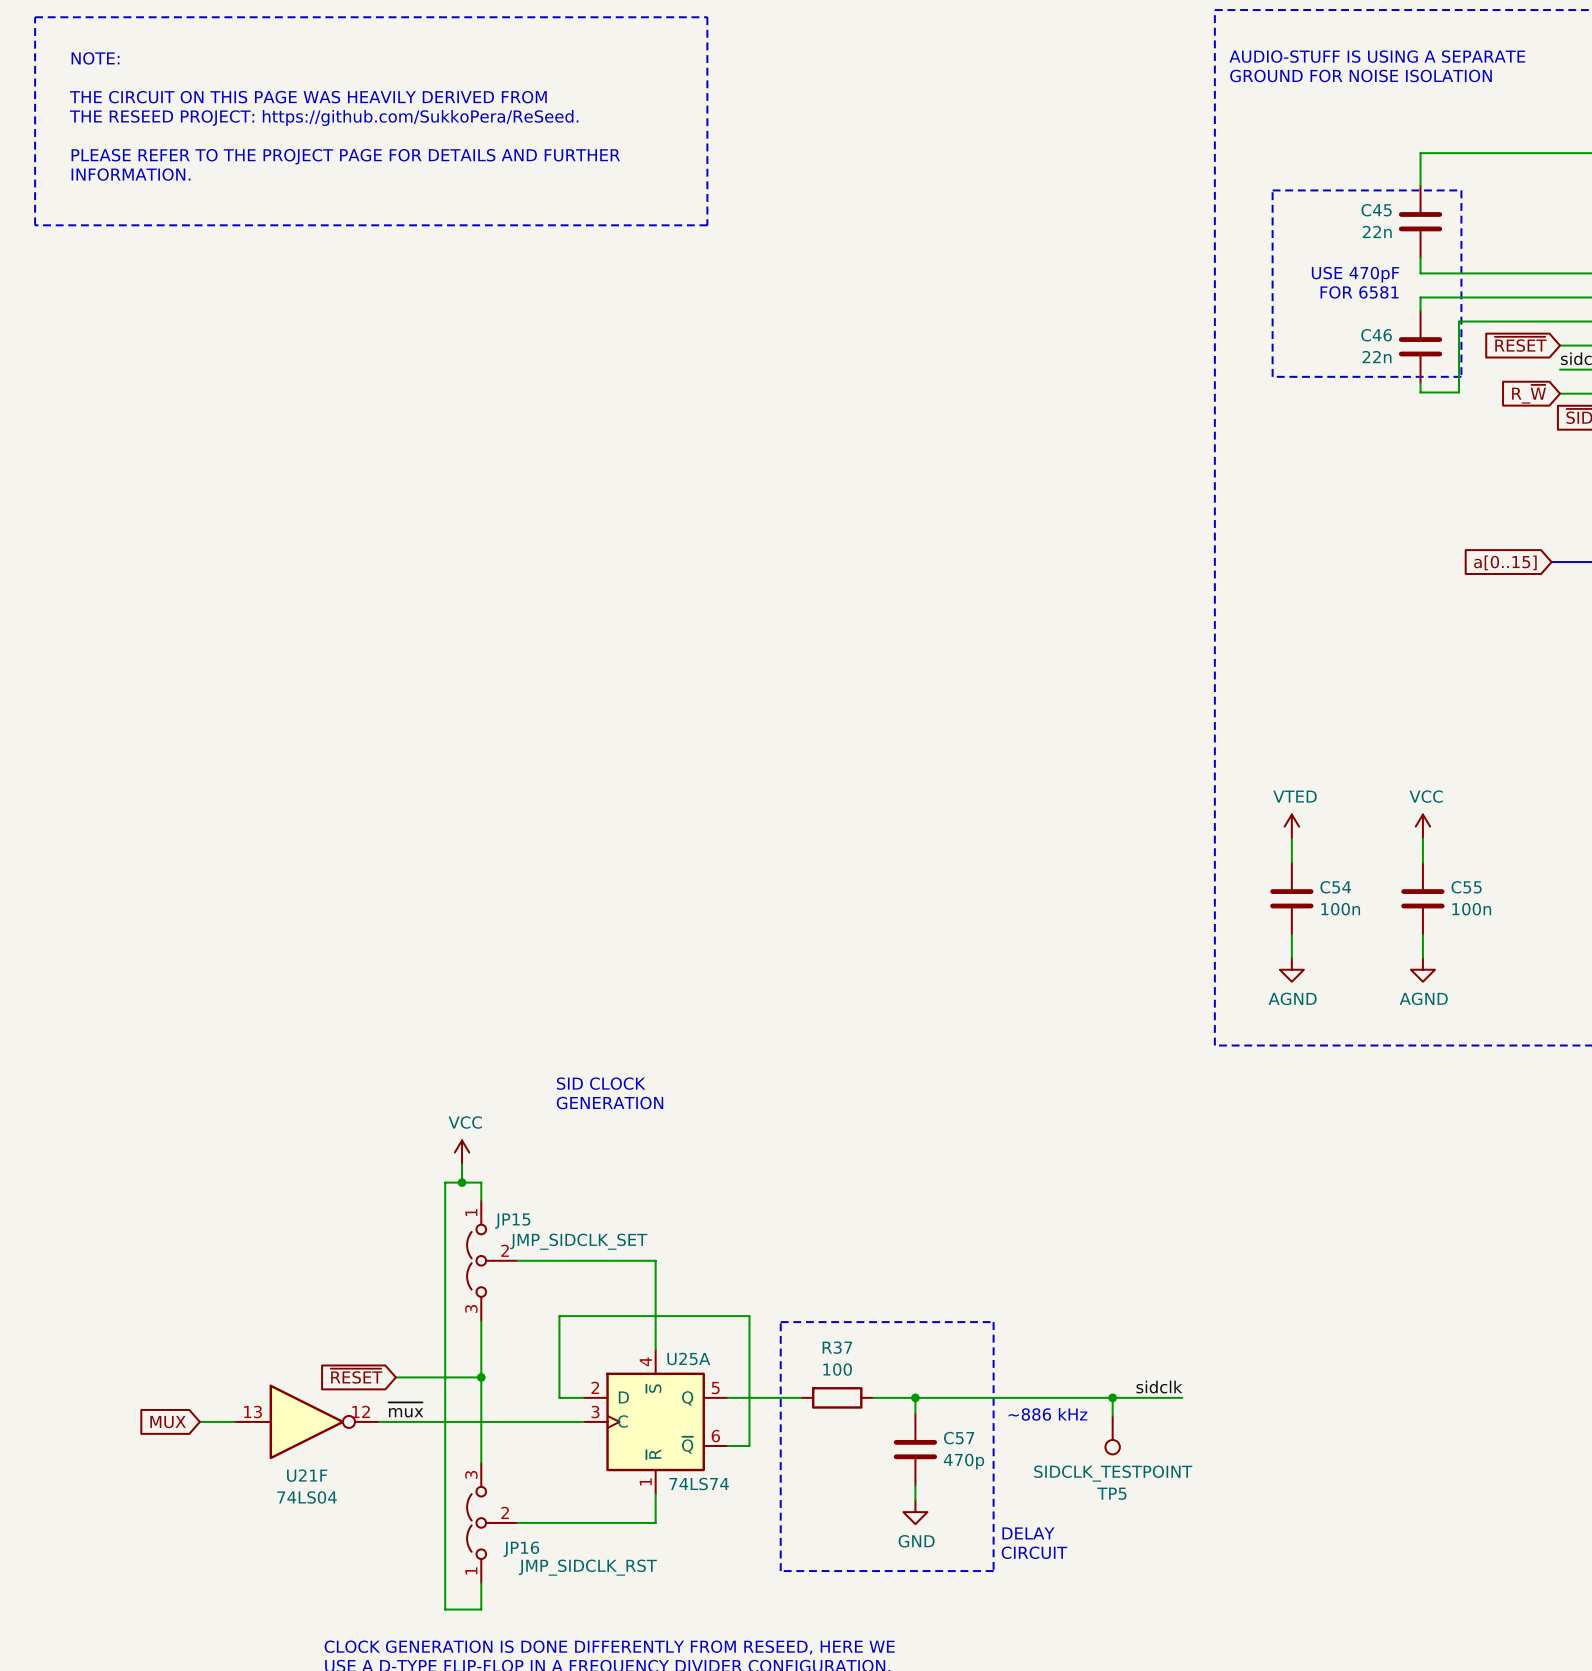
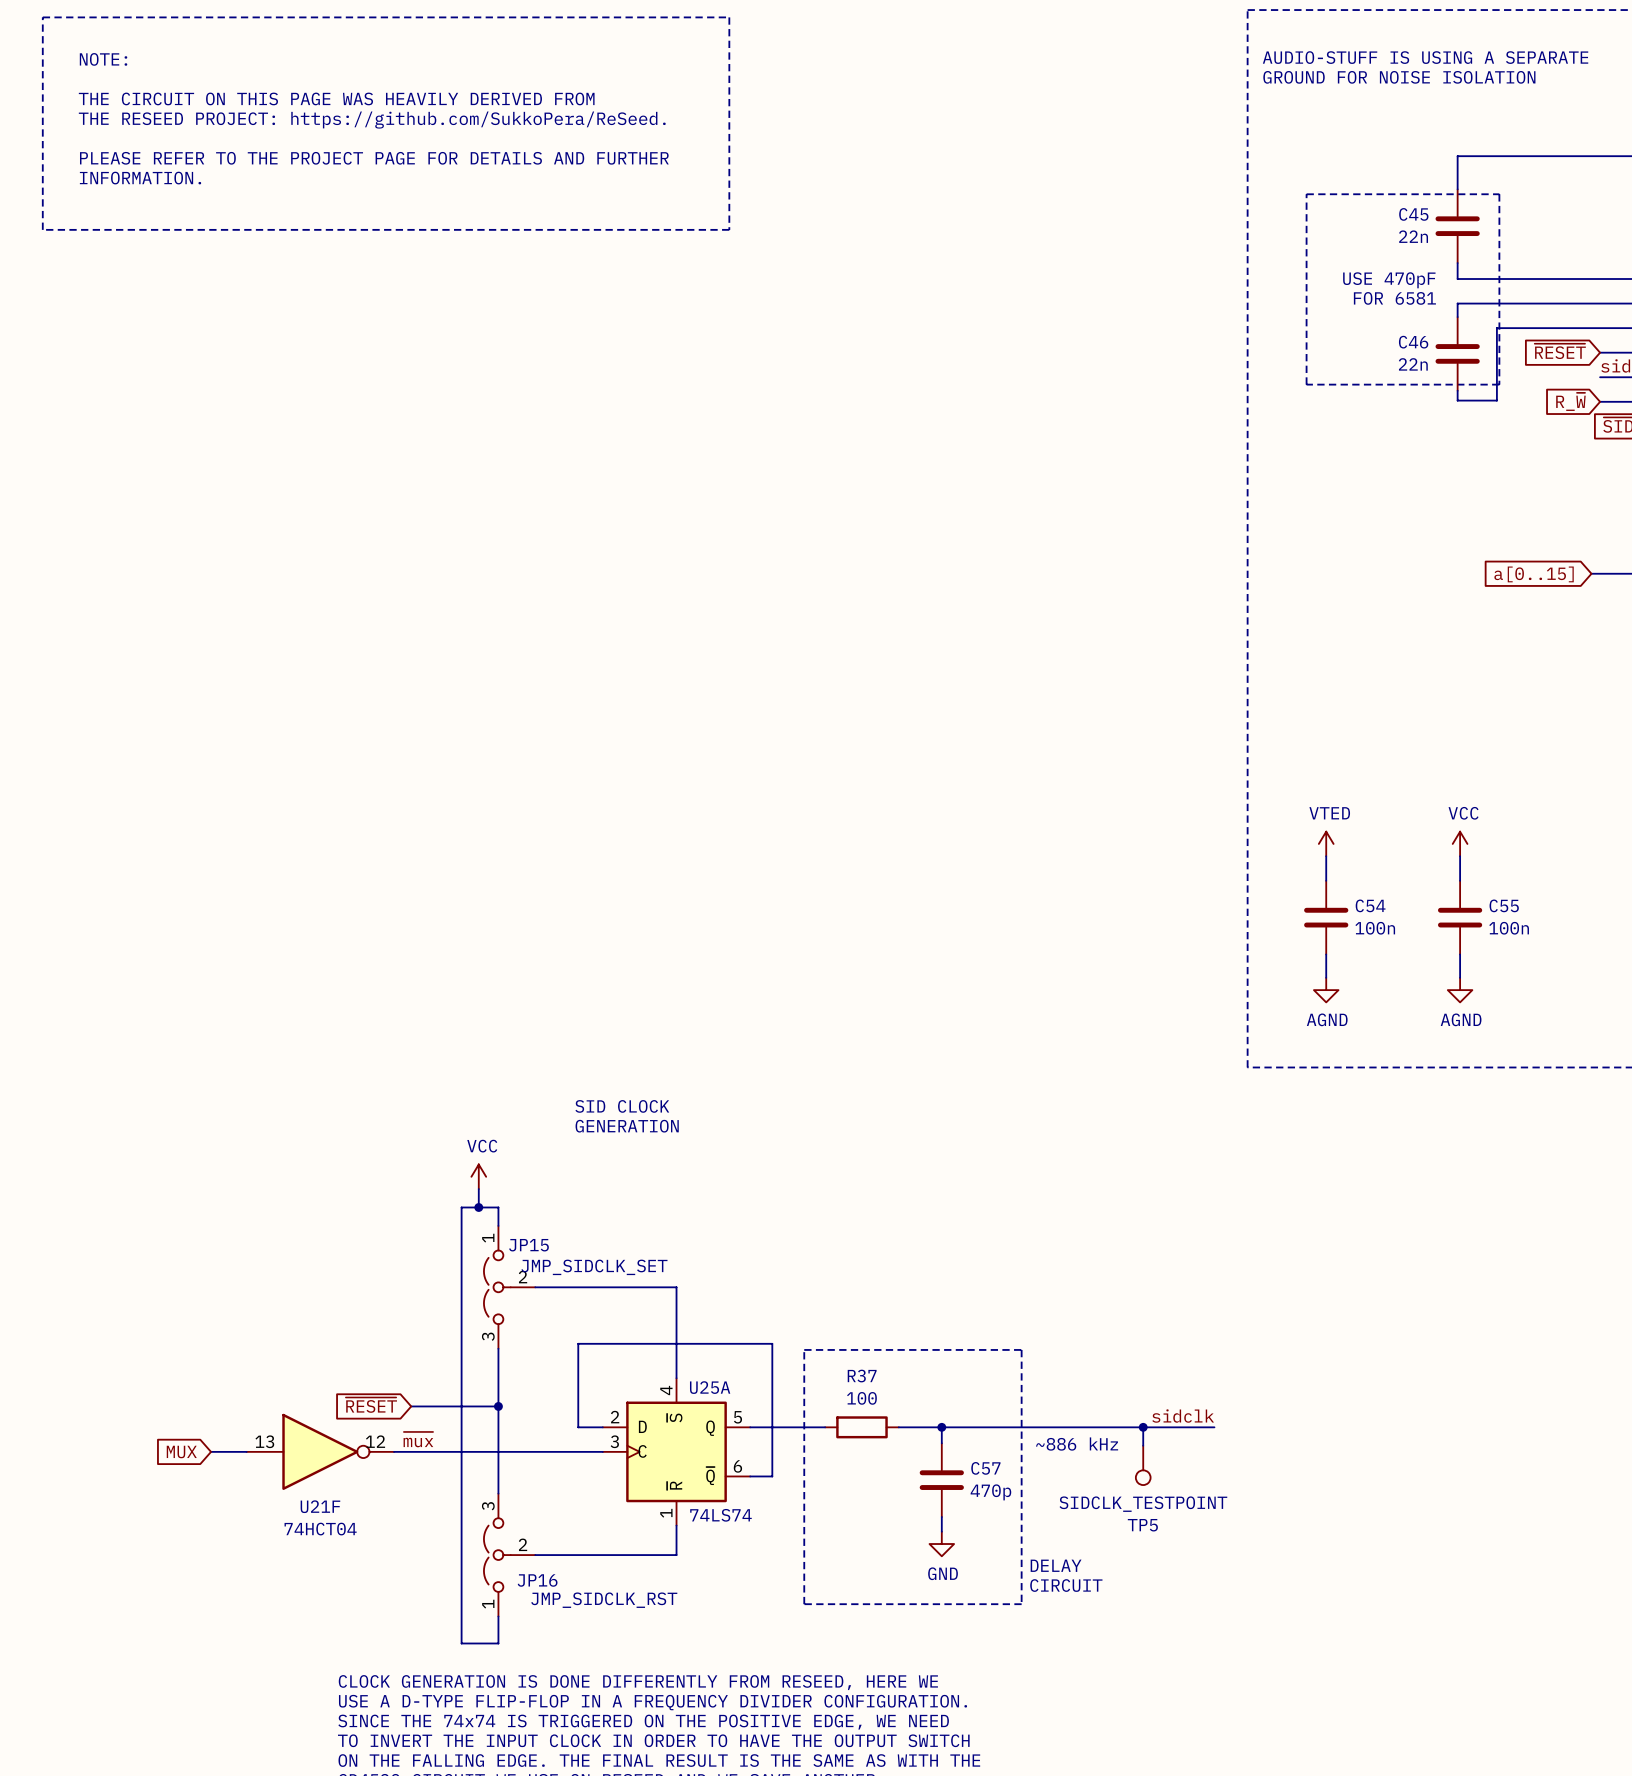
U21F value: 74LS04 (307, 1497) -> 74HCT04 (320, 1529)

